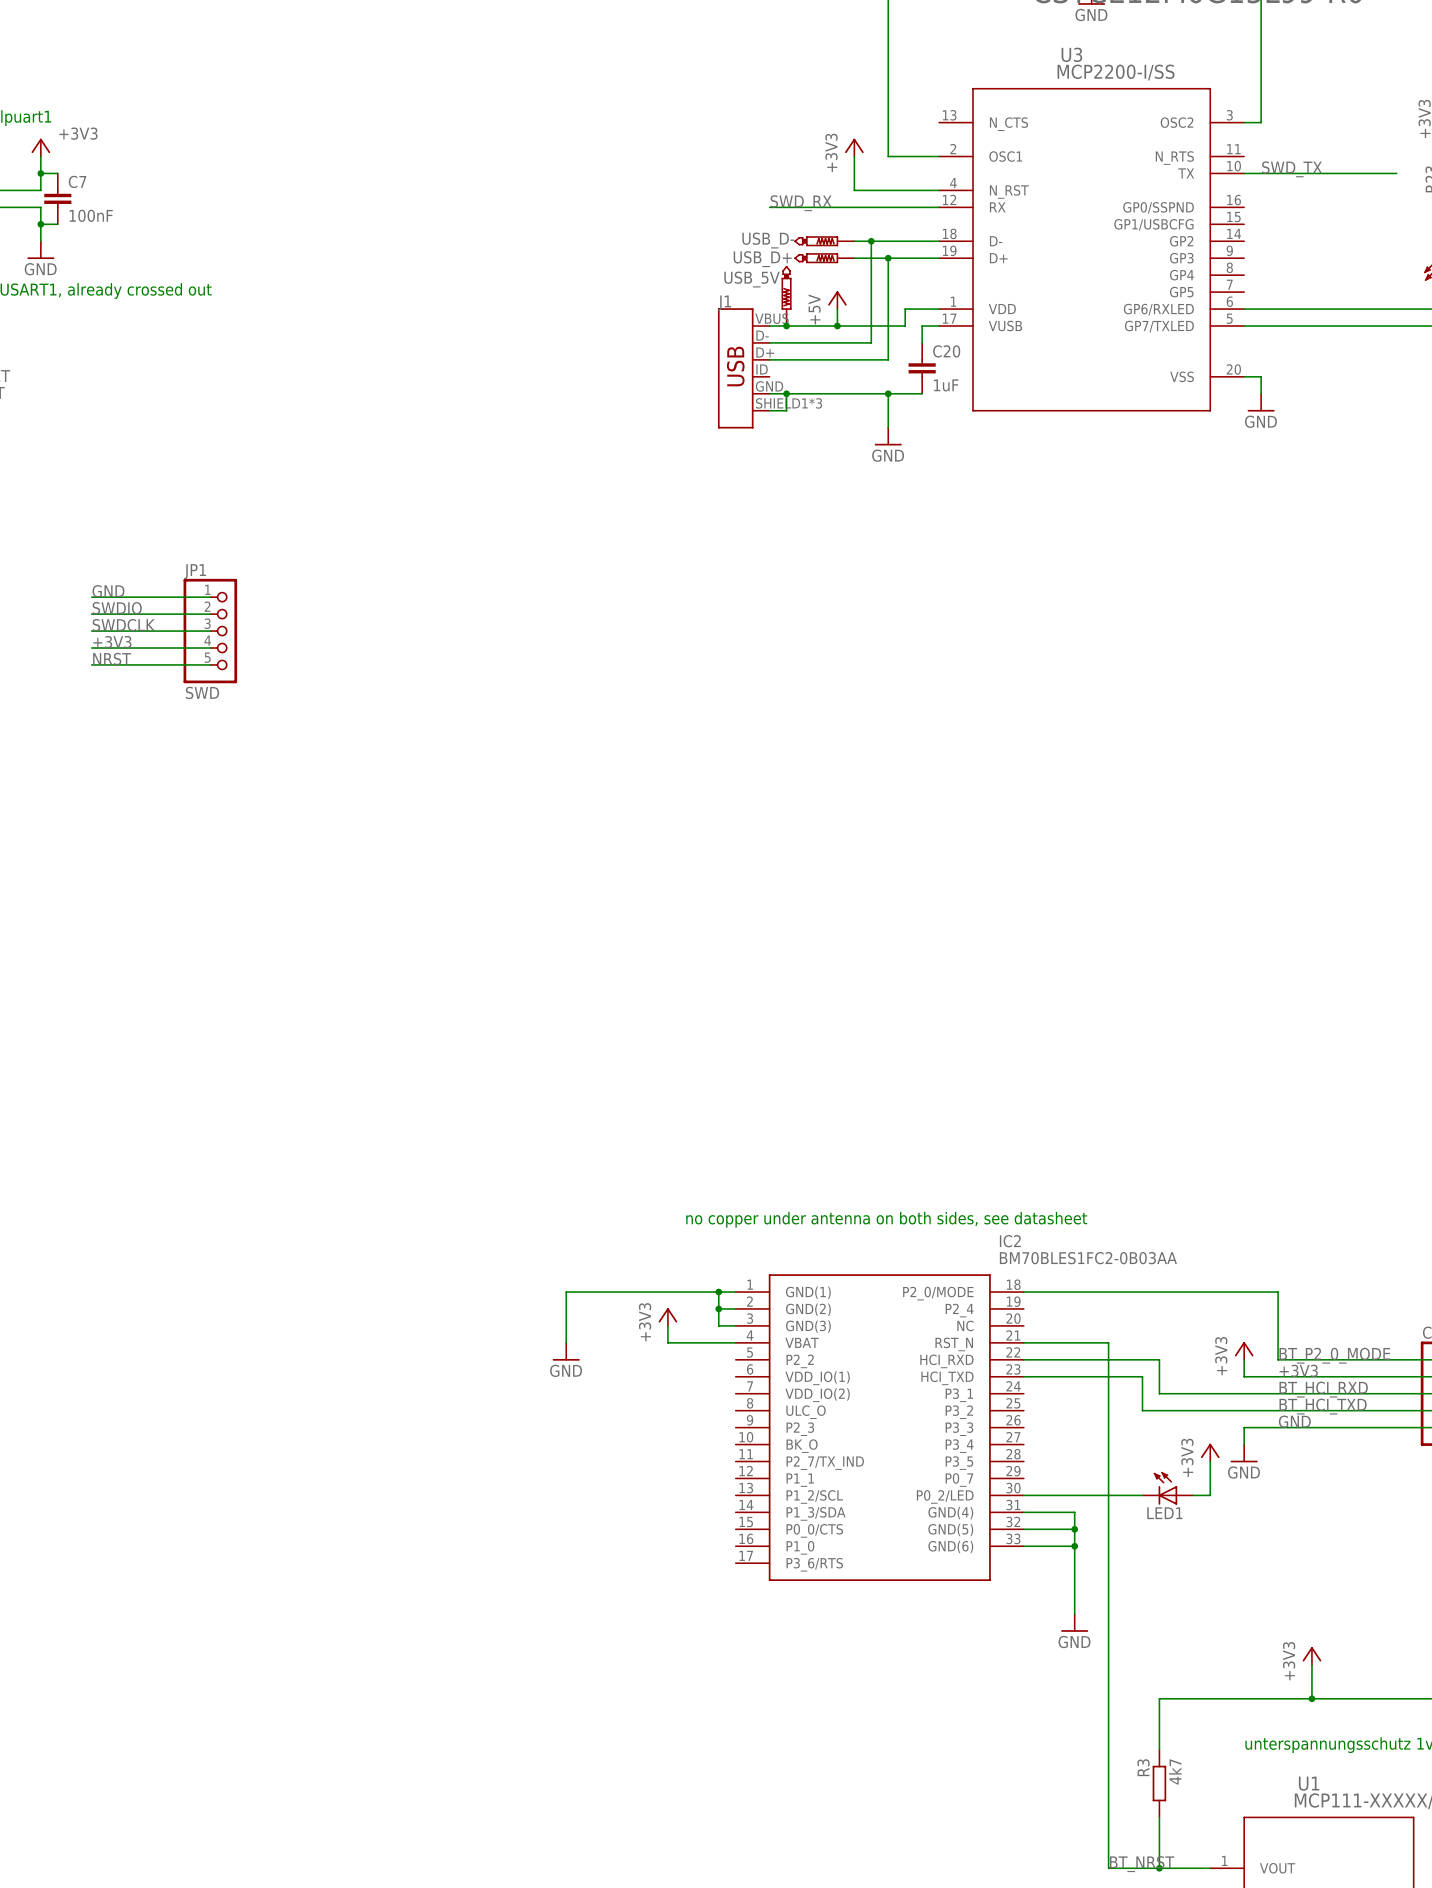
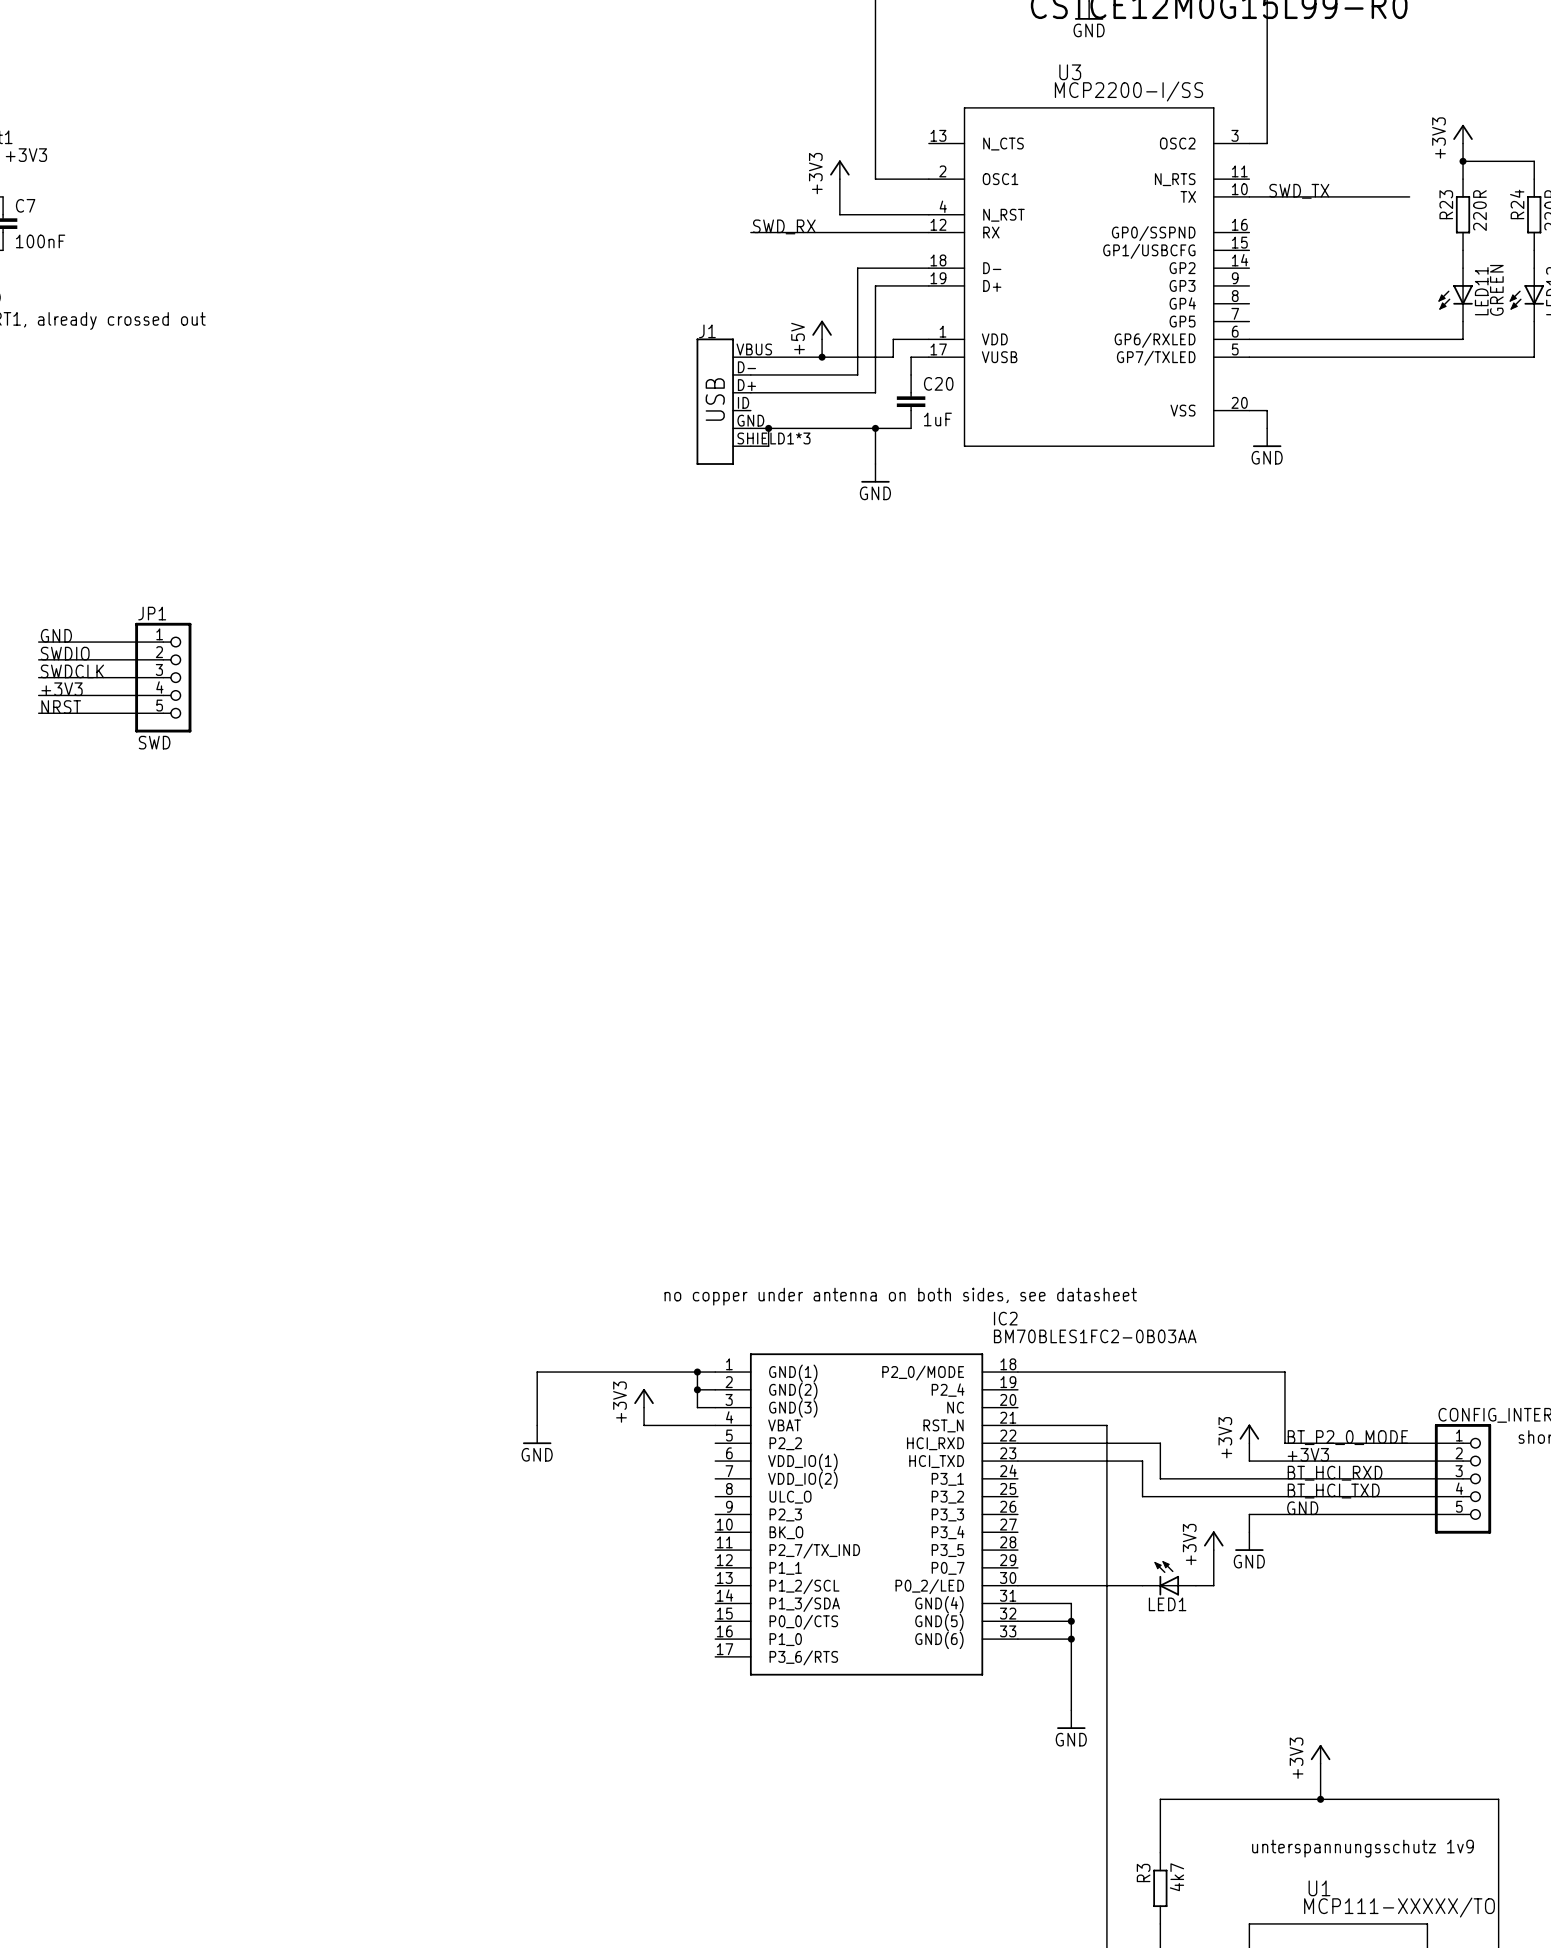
USB_D-: (824, 241) -> none
wire: (854, 241) (871, 241) -> none
junction: (871, 241) -> none
USB_D+: (824, 258) -> none
wire: (854, 258) (888, 258) -> none
junction: (888, 258) -> none
USB_5V: (786, 296) -> none
junction: (786, 325) -> none

